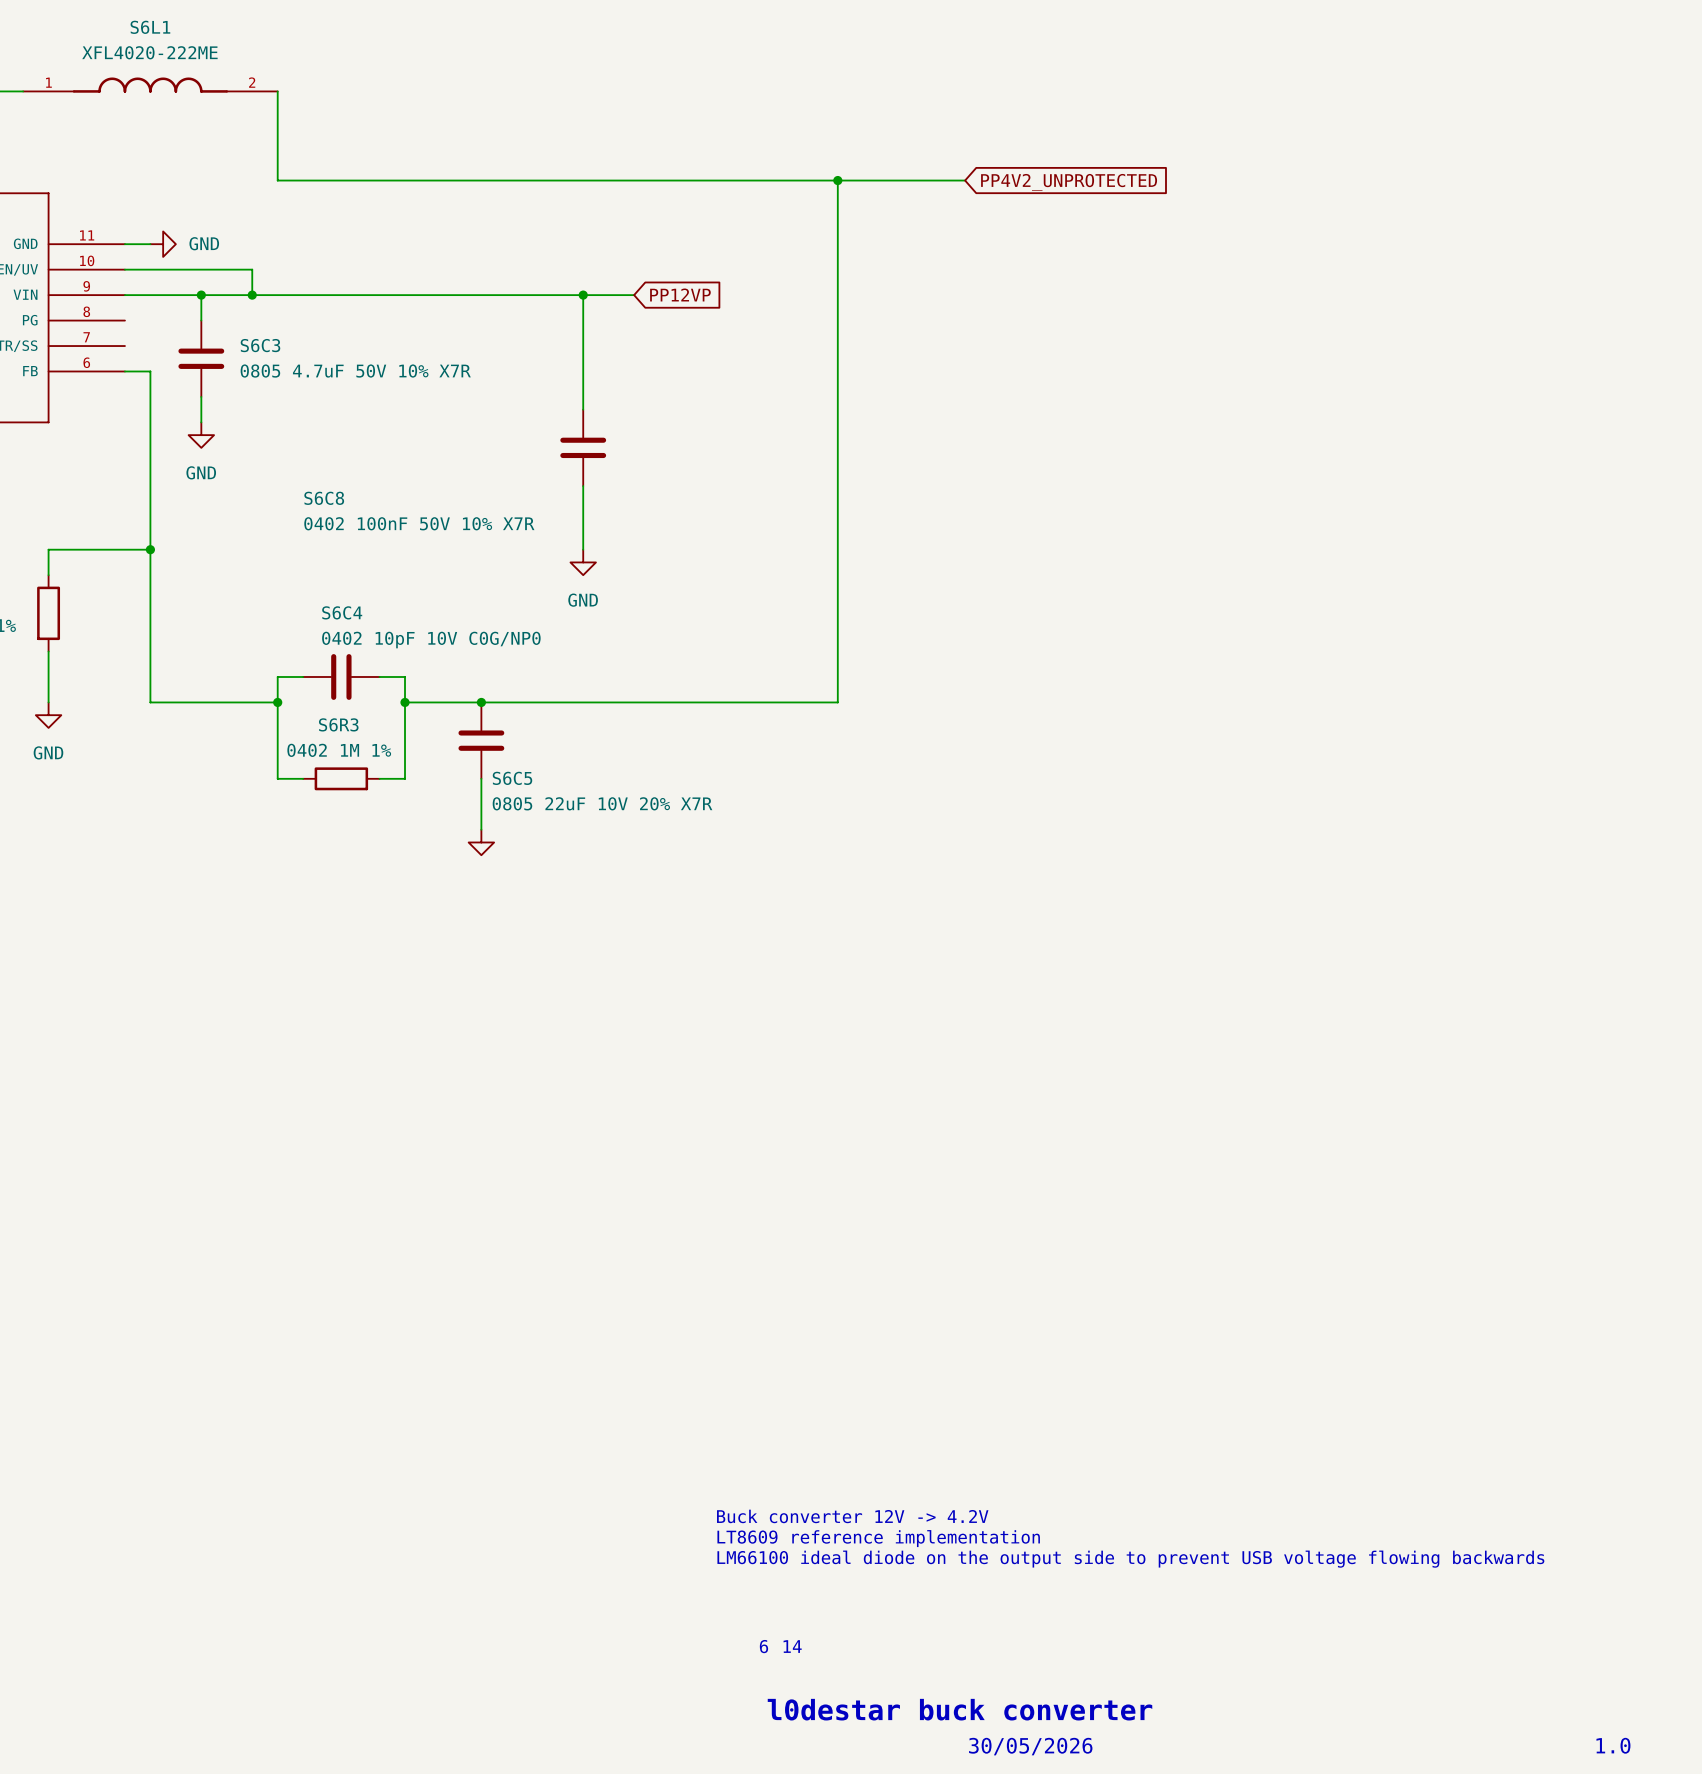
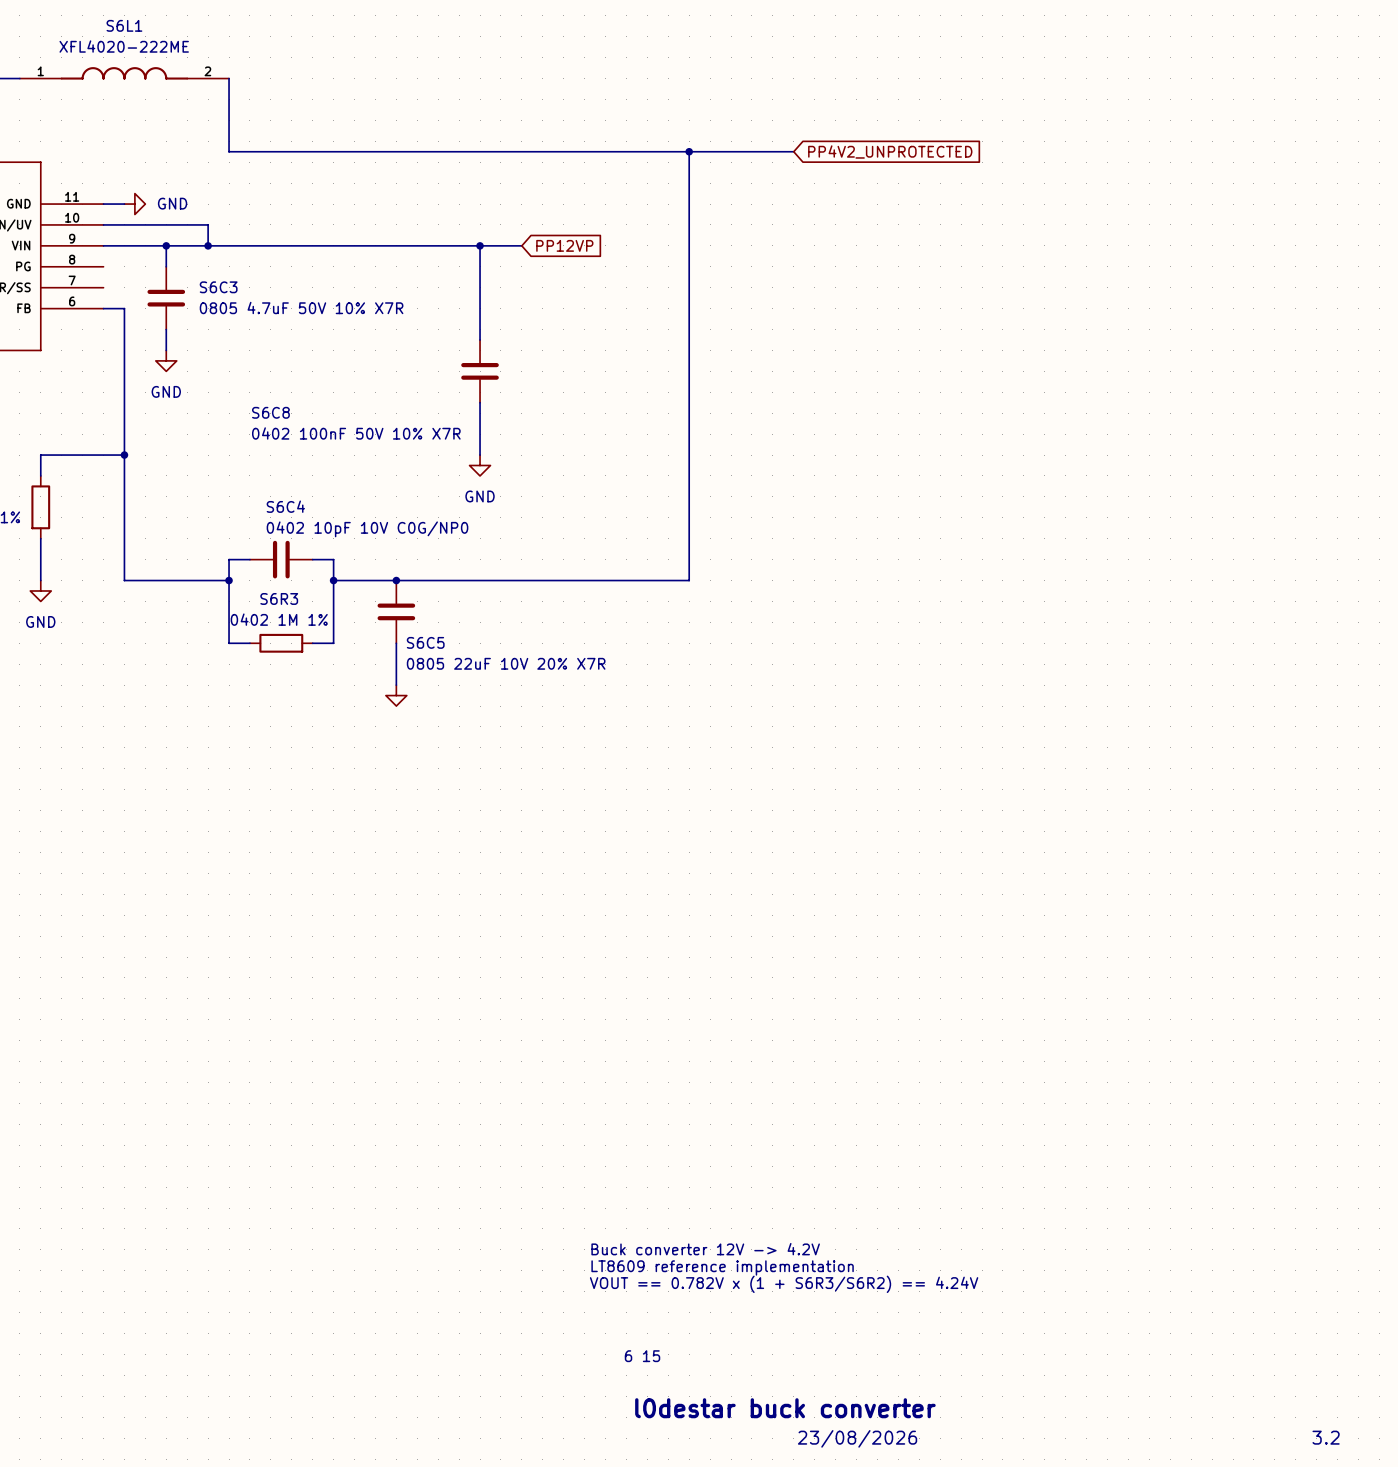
text: LM66100 ideal diode on the output side to prevent USB voltage flowing backwards (1130, 1559) -> VOUT == 0.782V x (1 + S6R3/S6R2) == 4.24V (784, 1284)
text: 14 (792, 1646) -> 15 (651, 1356)
text: 1.0 (1613, 1745) -> 3.2 (1326, 1437)
text: 30/05/2026 (1030, 1746) -> 23/08/2026 (857, 1438)

